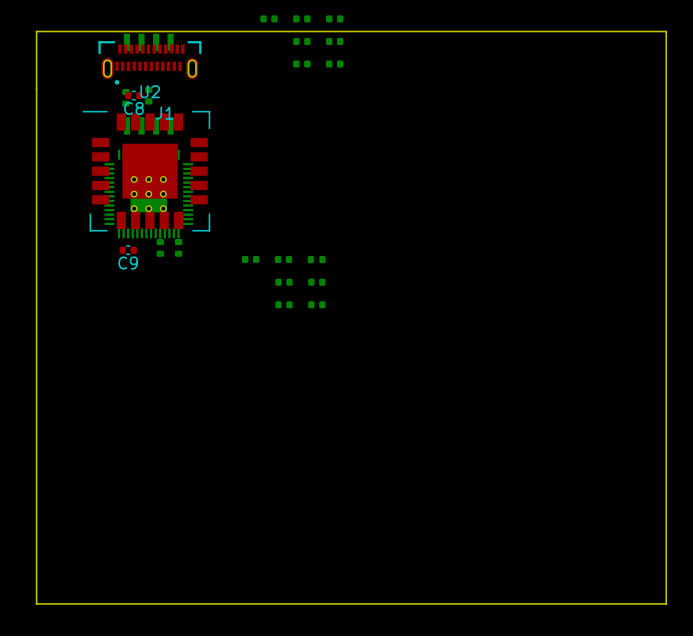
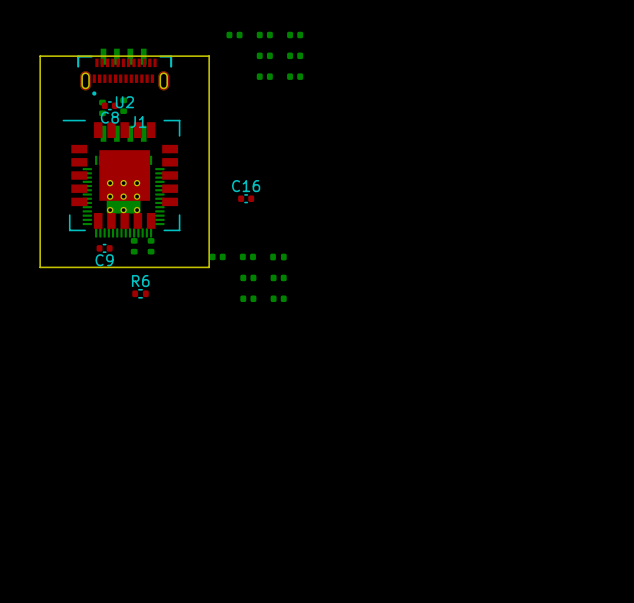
board edge: (36, 31) (36, 603) (666, 603) (666, 31) (36, 31) -> none
board edge: none -> (40, 56) (40, 267) (209, 267) (209, 56) (40, 56)
C16: none -> (246, 198)
R6: none -> (140, 293)

